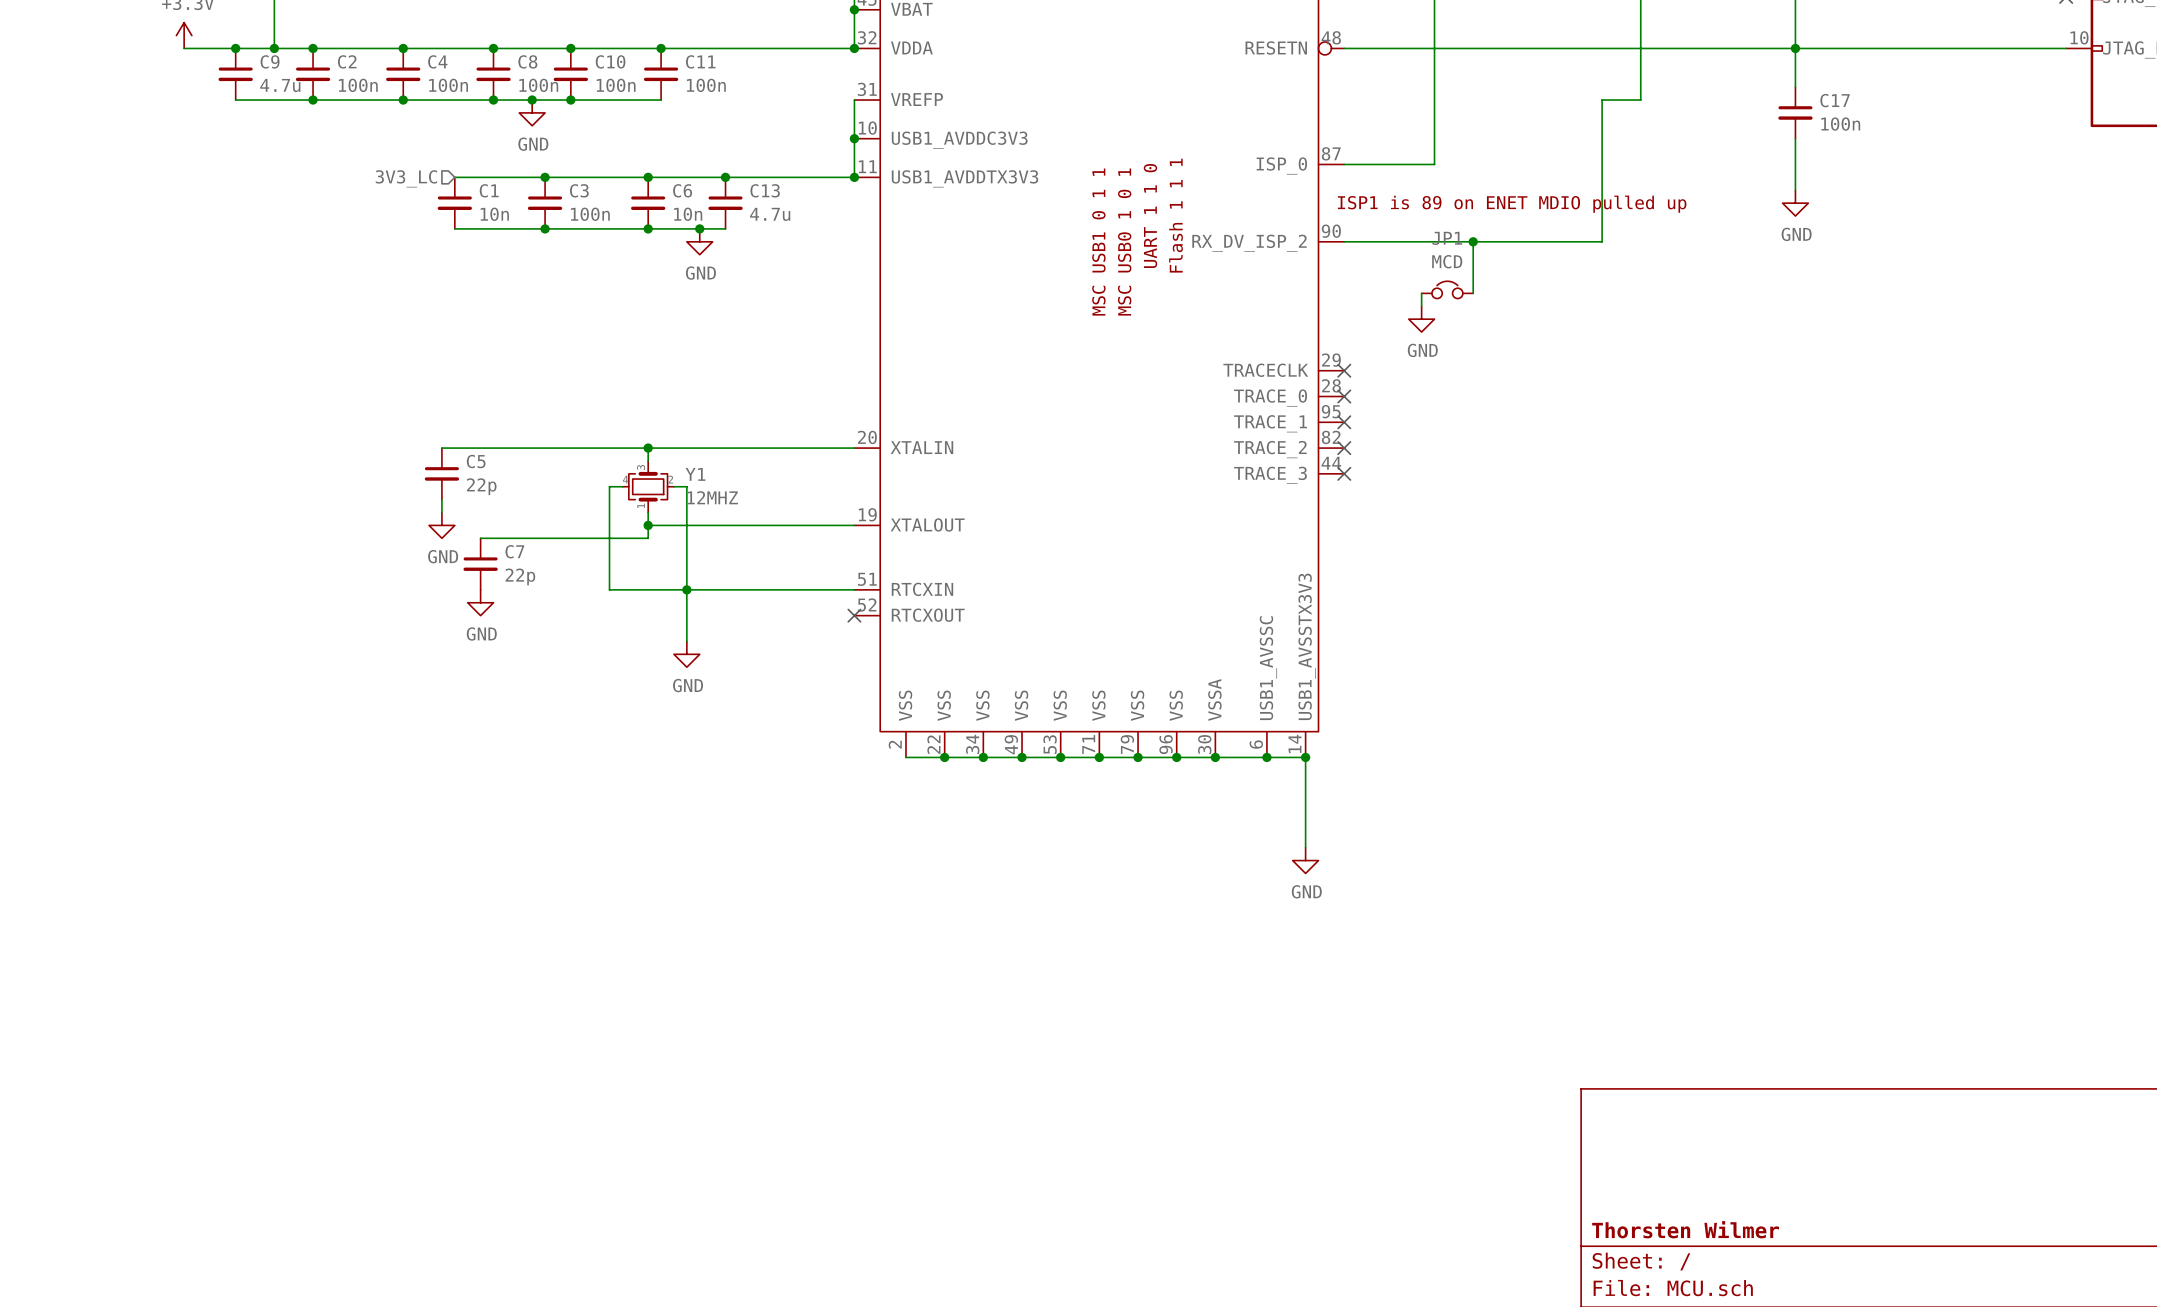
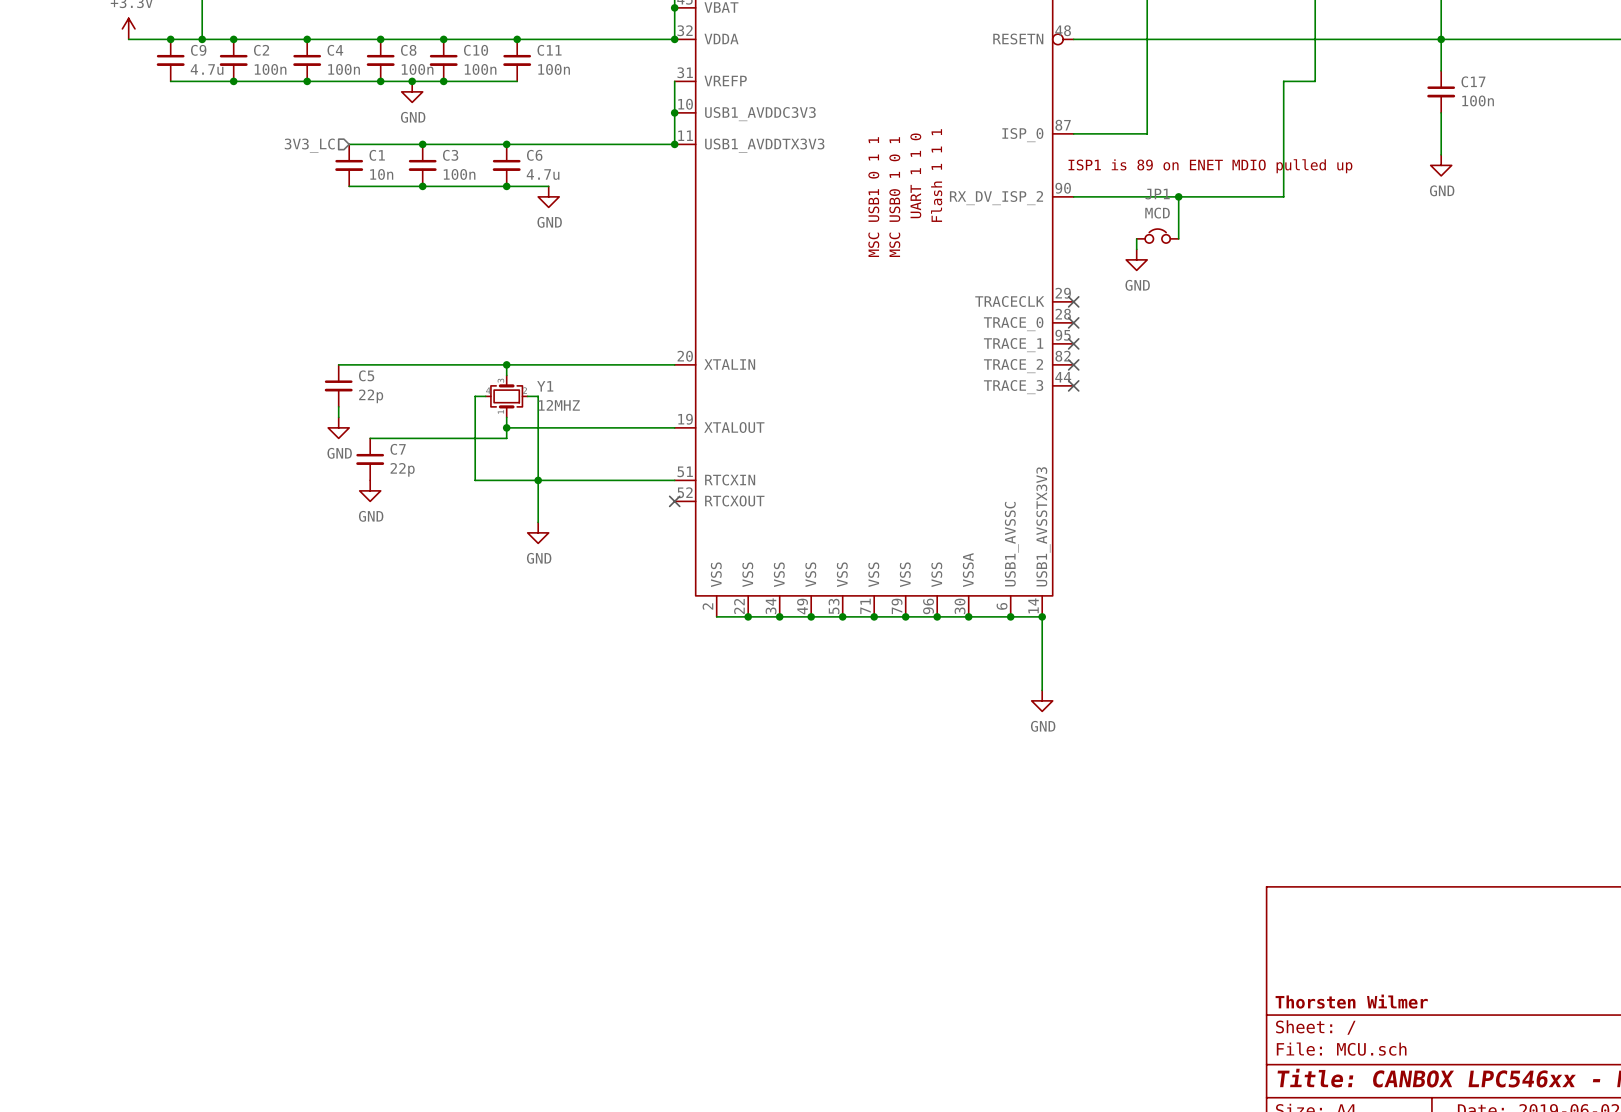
junction: (725, 177) -> none
C13: 4.7u (725, 203) -> none
C6 value: 10n (688, 214) -> 4.7u (543, 174)
wire: (699, 228) (725, 228) -> none
junction: (699, 228) -> none

